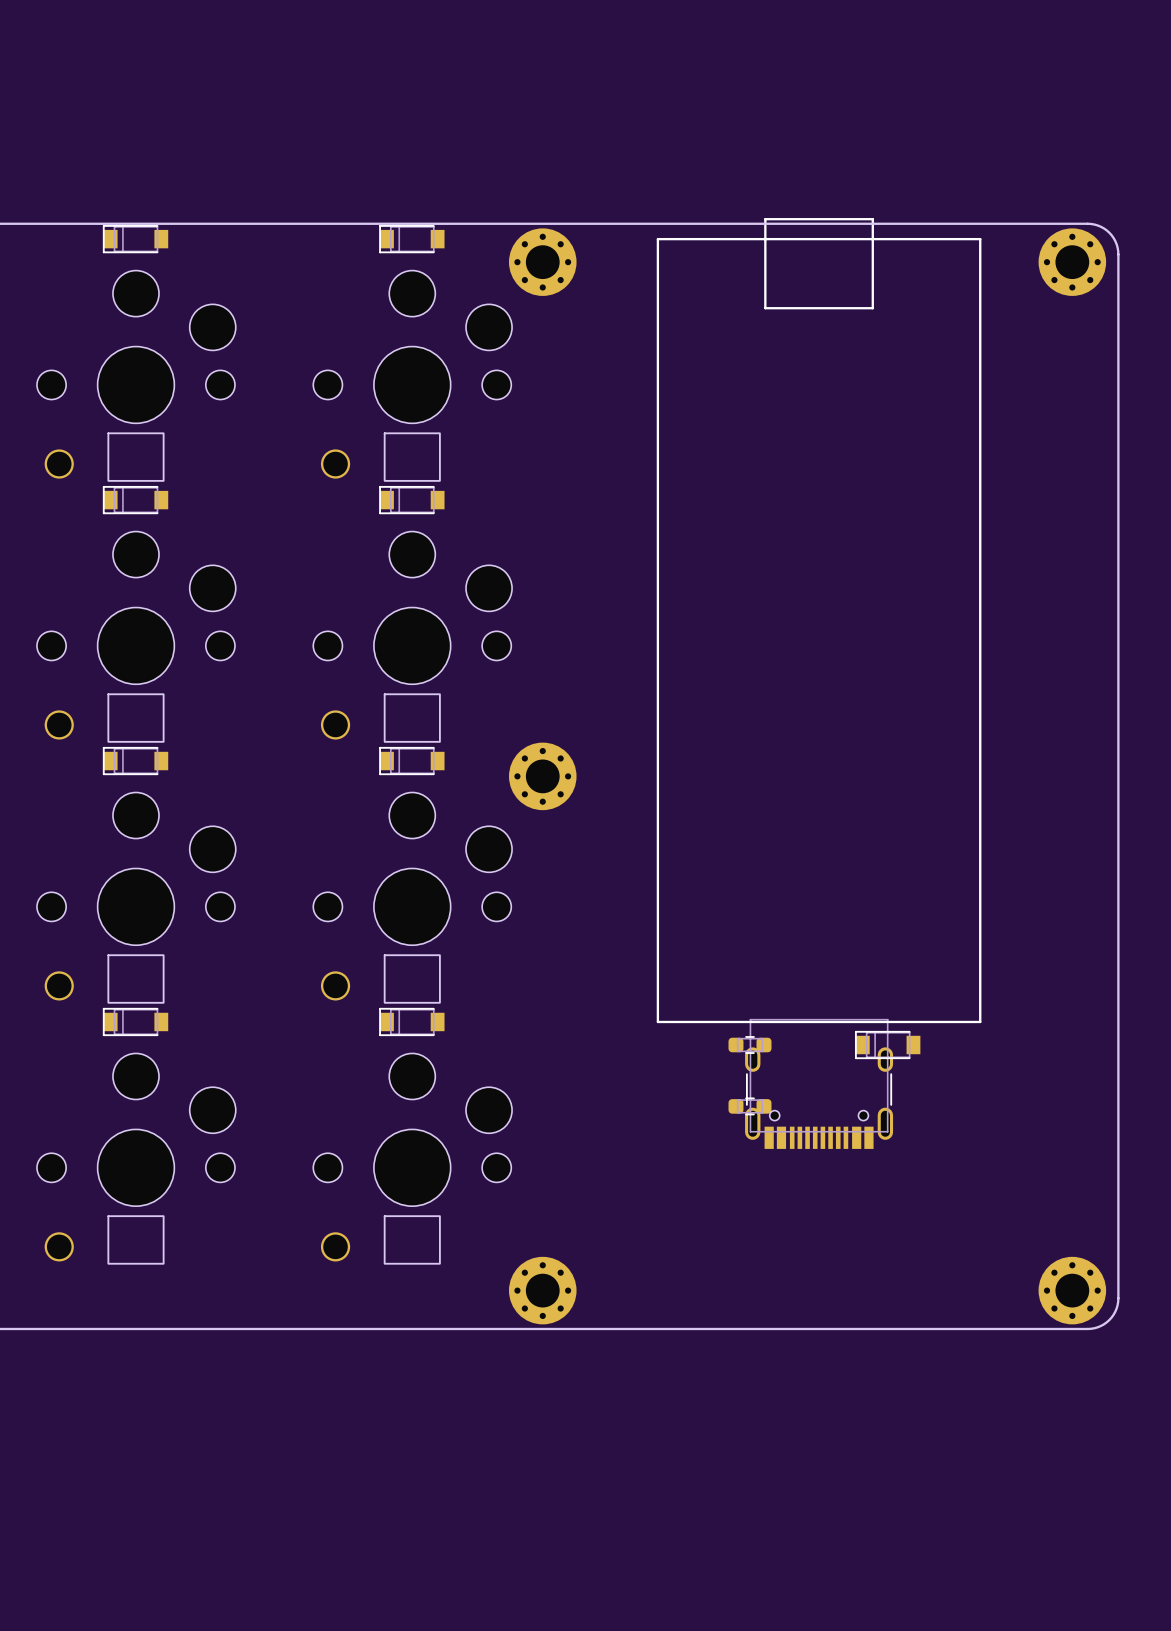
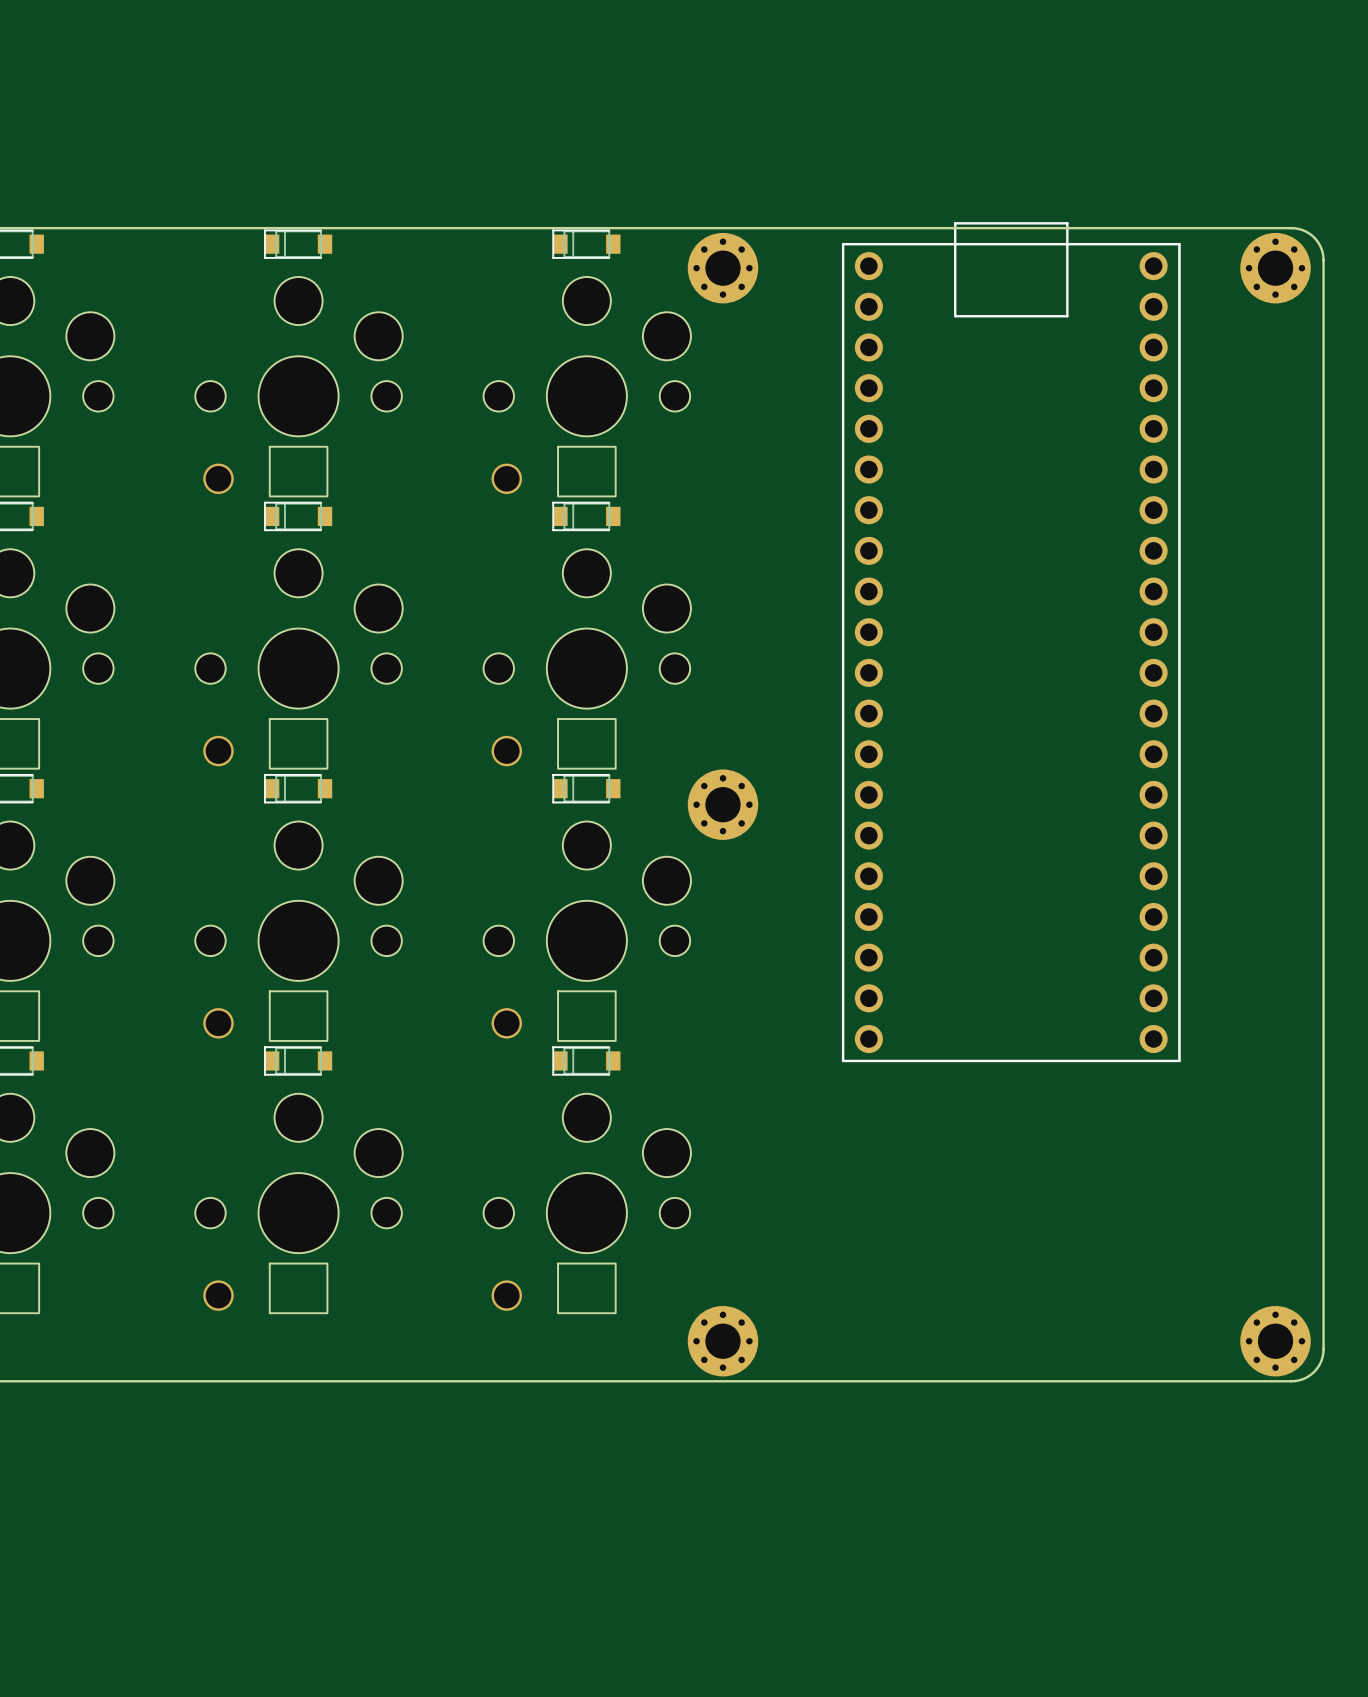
part footprint: [656, 218, 982, 1024] -> [841, 222, 1181, 1063]
part: (749, 1045) -> none
part: (887, 1045) -> none
part: (819, 1083) -> none
part: (749, 1106) -> none

